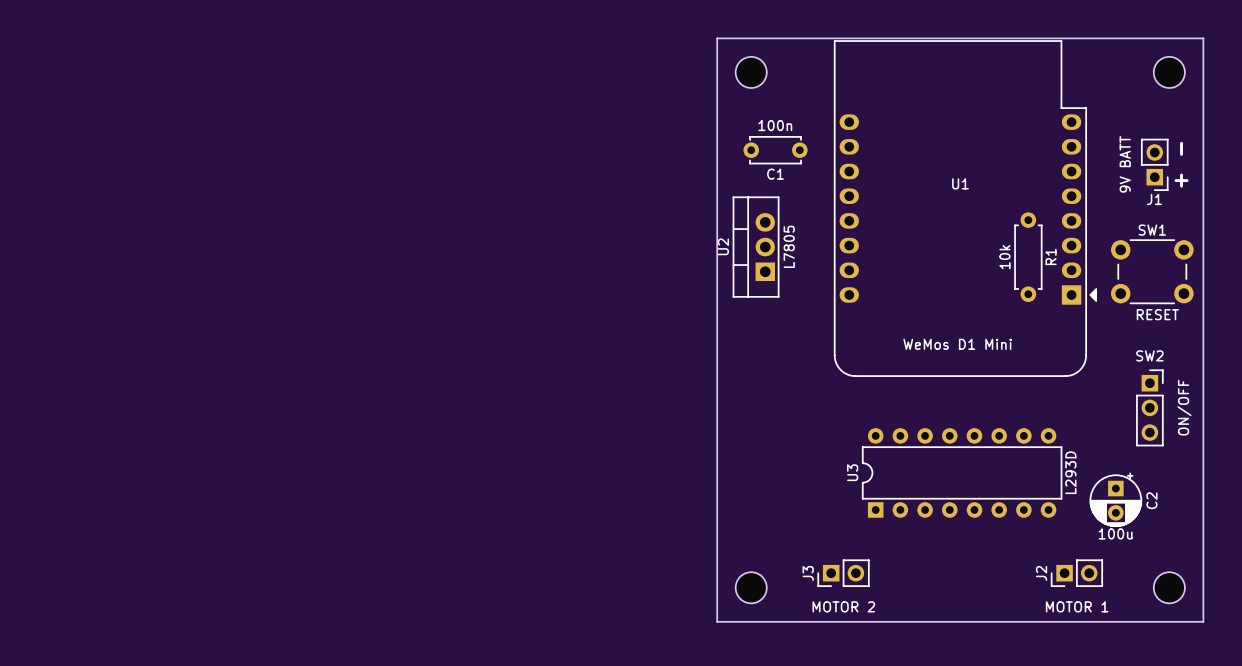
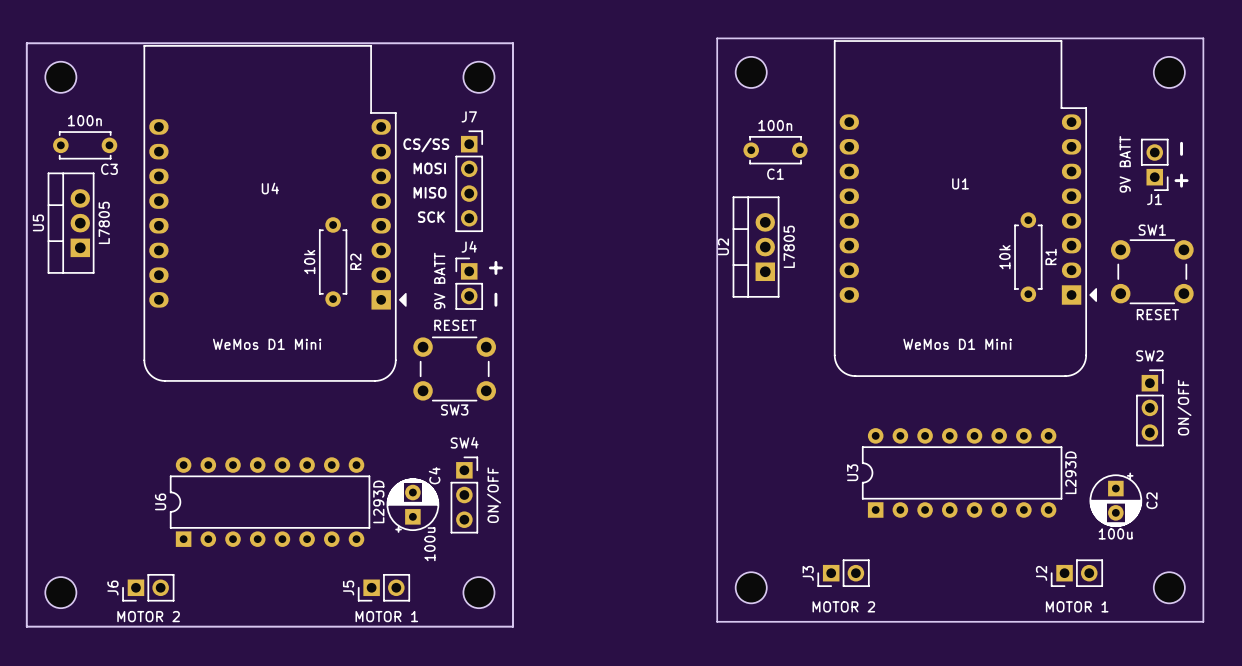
board edge: none -> (26, 43) (512, 43) (512, 626) (26, 626) (26, 43)
part: none -> (60, 77)
part: none -> (478, 77)
C3: none -> 100n (85, 145)
text: none -> CS/SS (426, 145)
text: none -> MOSI (429, 168)
J7: none -> (469, 181)
text: none -> MISO (430, 192)
U4: none -> WeMos D1 Mini (275, 213)
text: none -> SCK (431, 217)
U5: none -> L7805 (71, 223)
R2: none -> 10k (333, 262)
text: none -> + (495, 267)
J4: none -> 9V BATT (469, 283)
text: none -> - (495, 299)
SW3: none -> RESET (454, 368)
SW4: none -> ON/OFF (464, 495)
U6: none -> L293D (270, 502)
C4: none -> 100u (412, 505)
J6: none -> MOTOR 2 (148, 587)
J5: none -> MOTOR 1 (383, 587)
part: none -> (60, 592)
part: none -> (478, 592)

